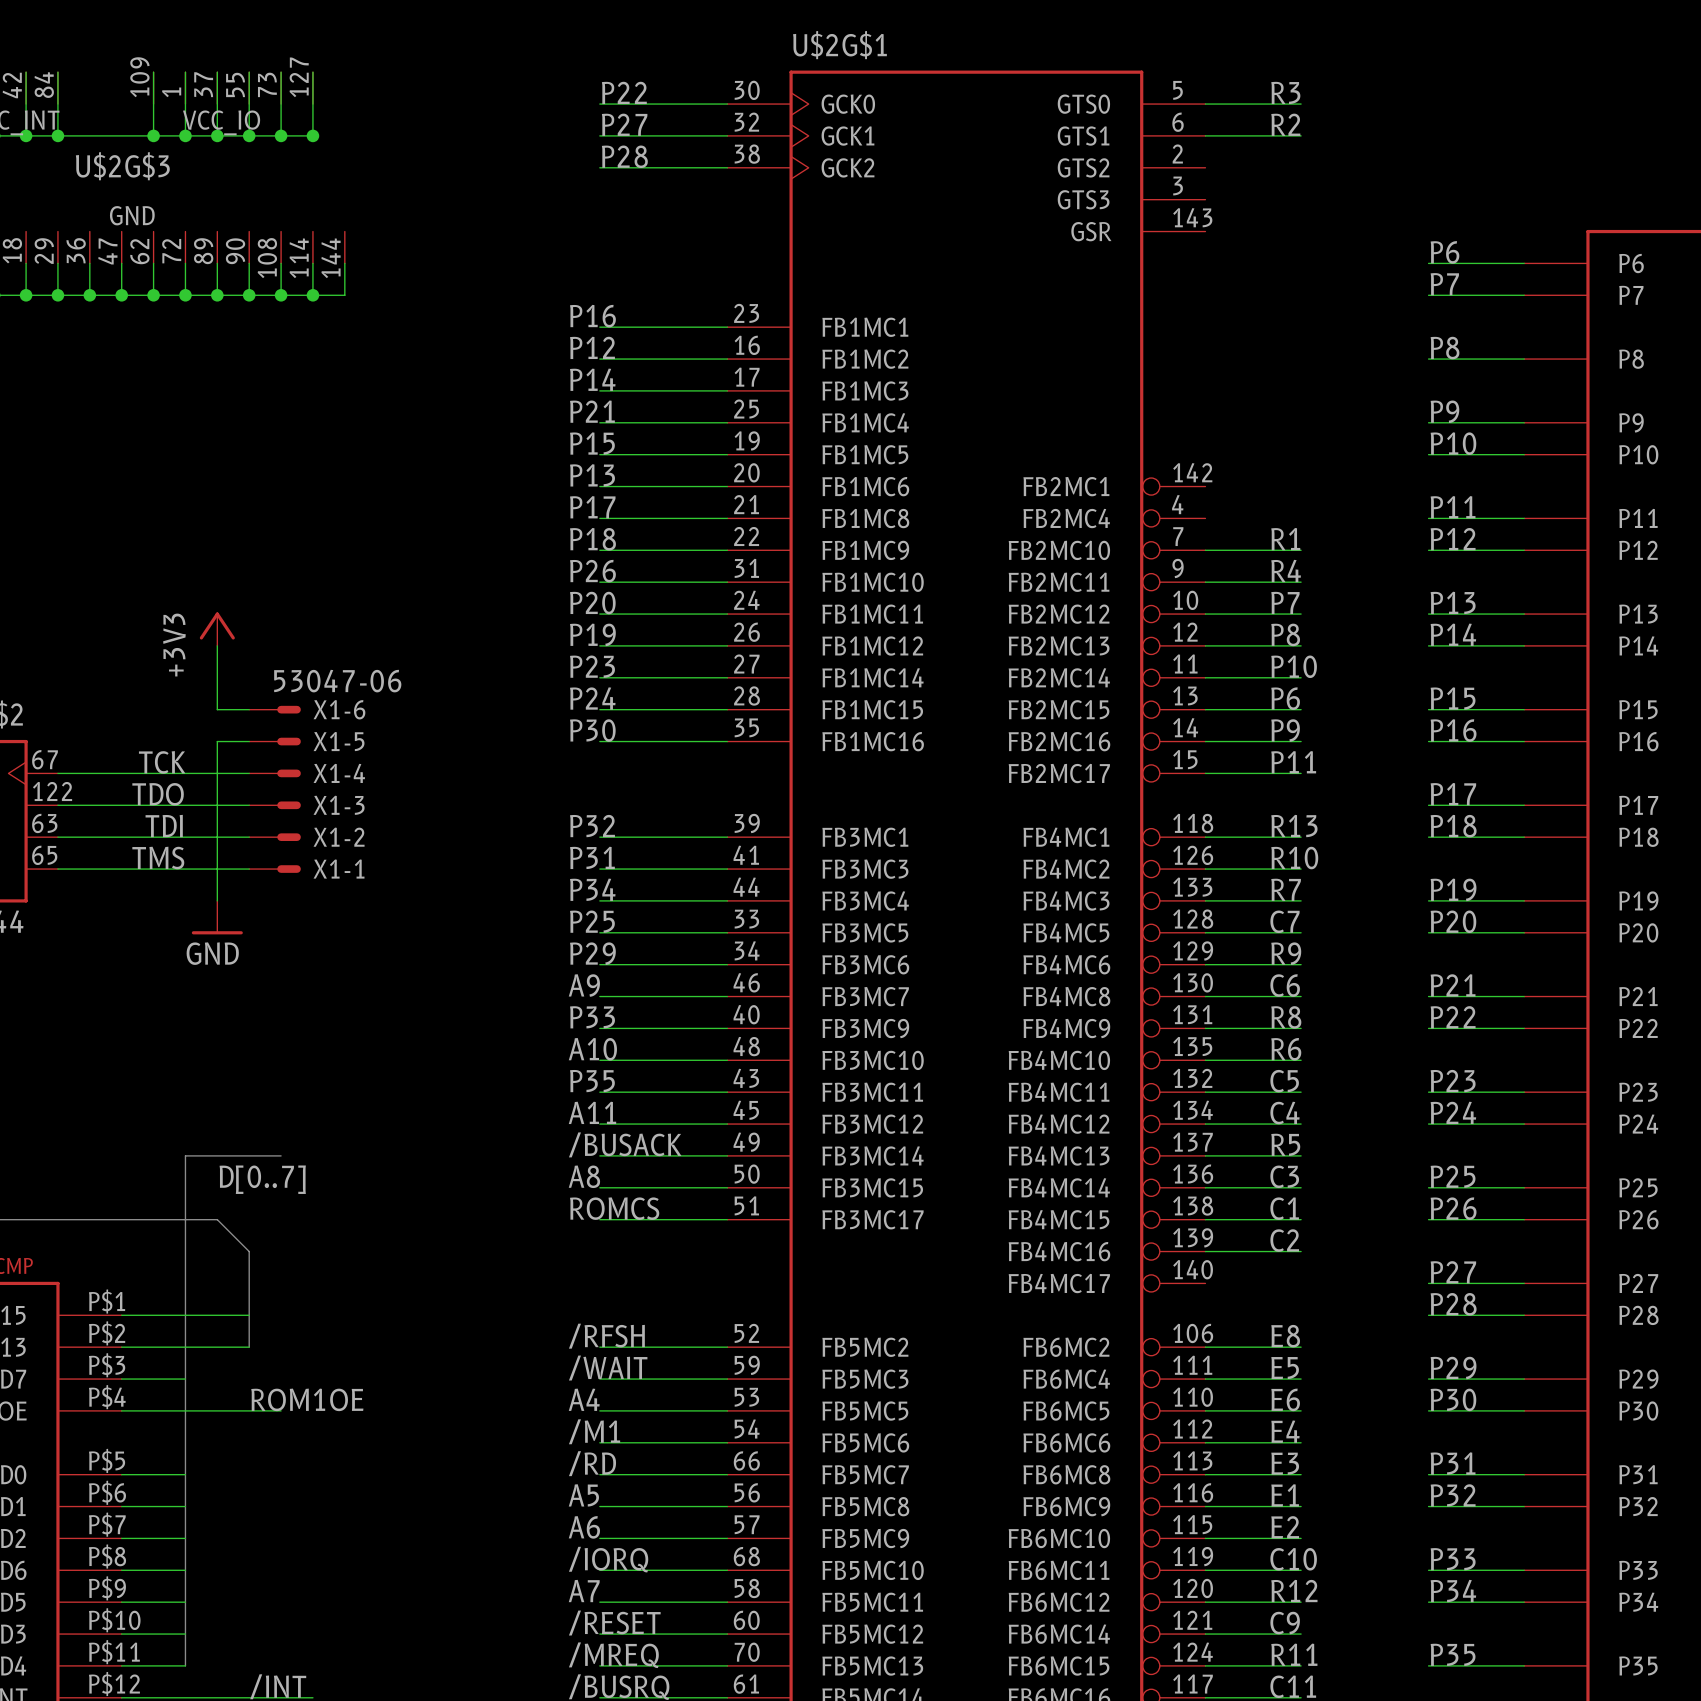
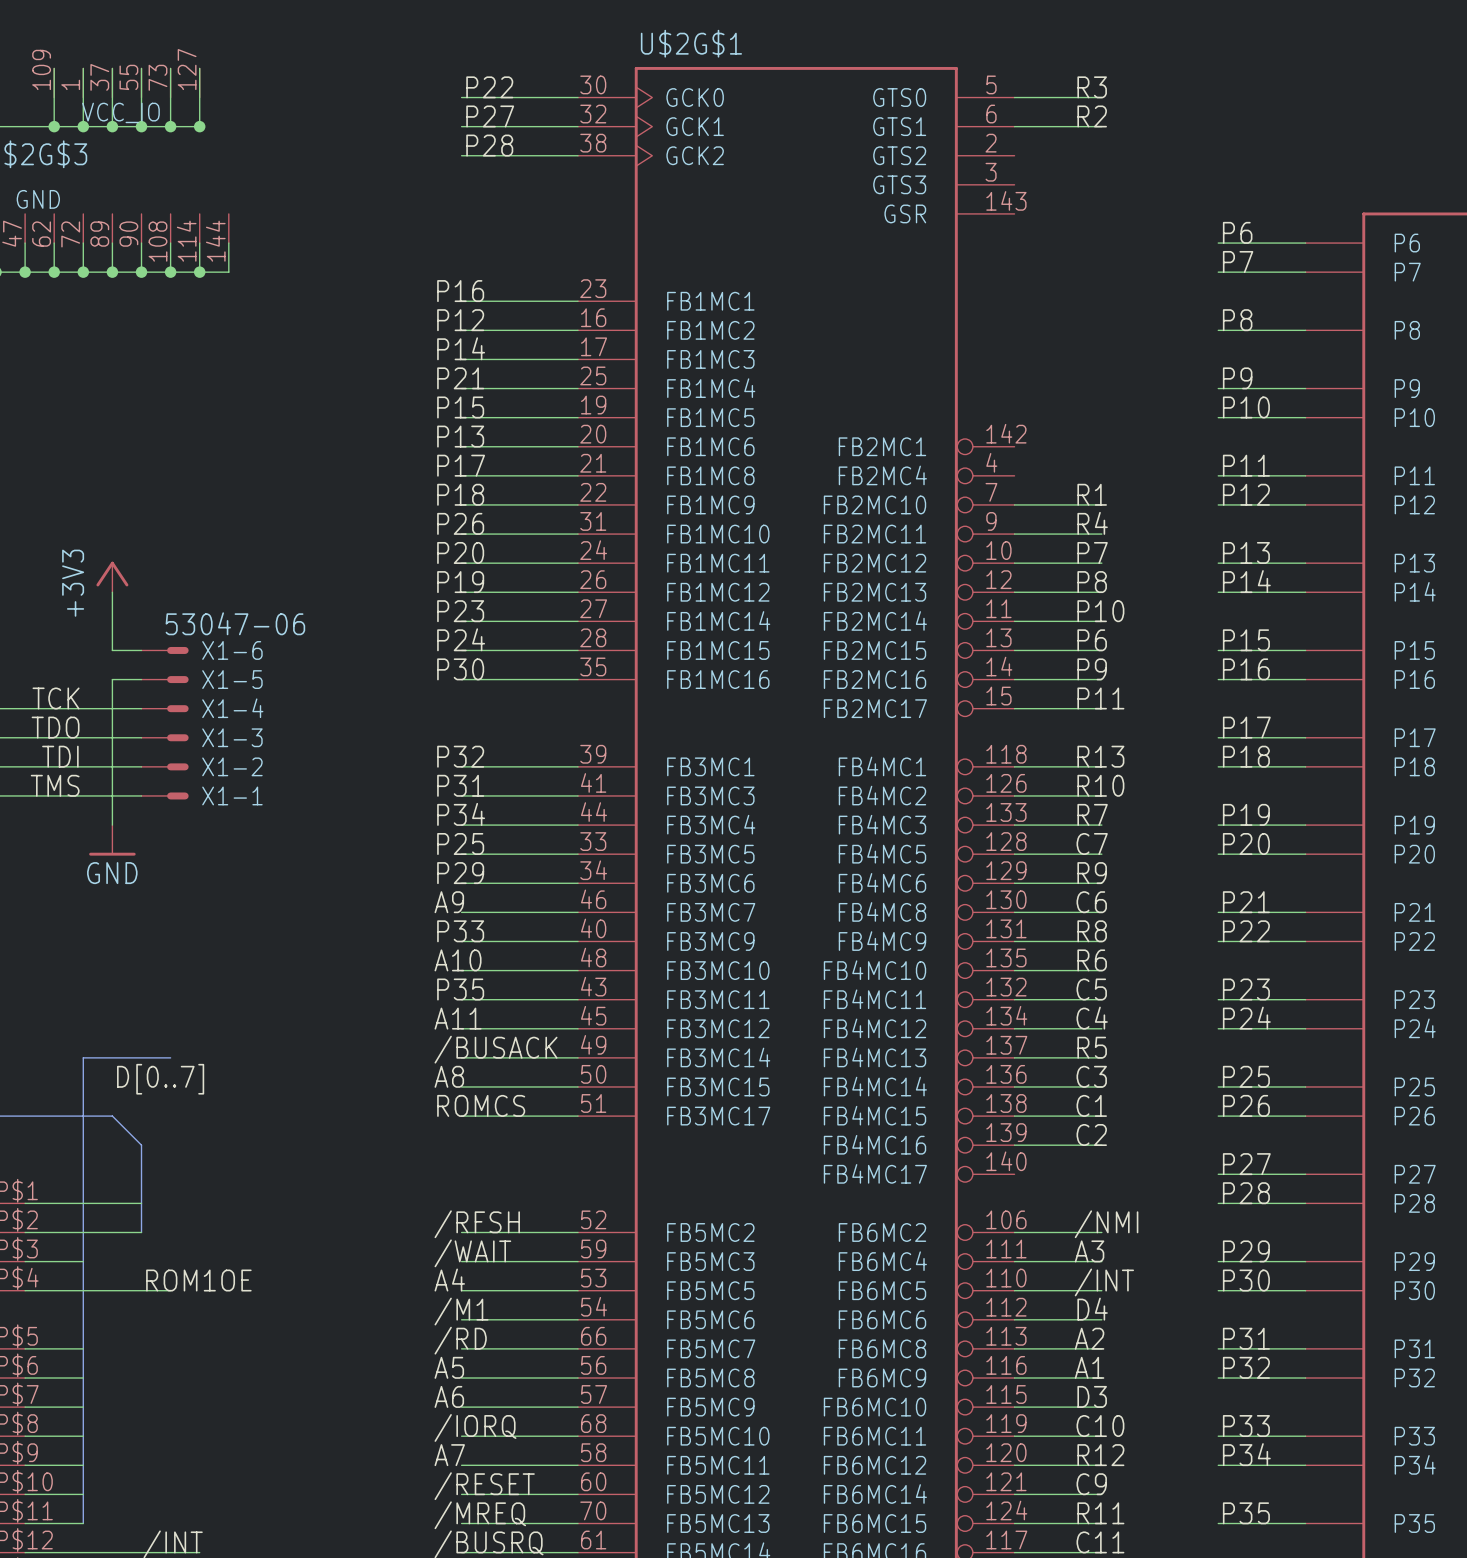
label: E8 (1285, 1336) -> /NMI (1106, 1224)
label: E5 (1285, 1368) -> A3 (1089, 1251)
label: E6 (1285, 1399) -> /INT (1104, 1282)
label: E4 (1285, 1431) -> D4 (1092, 1309)
label: E3 (1285, 1463) -> A2 (1089, 1338)
label: E1 (1285, 1495) -> A1 (1089, 1367)
label: E2 (1285, 1527) -> D3 (1092, 1396)

